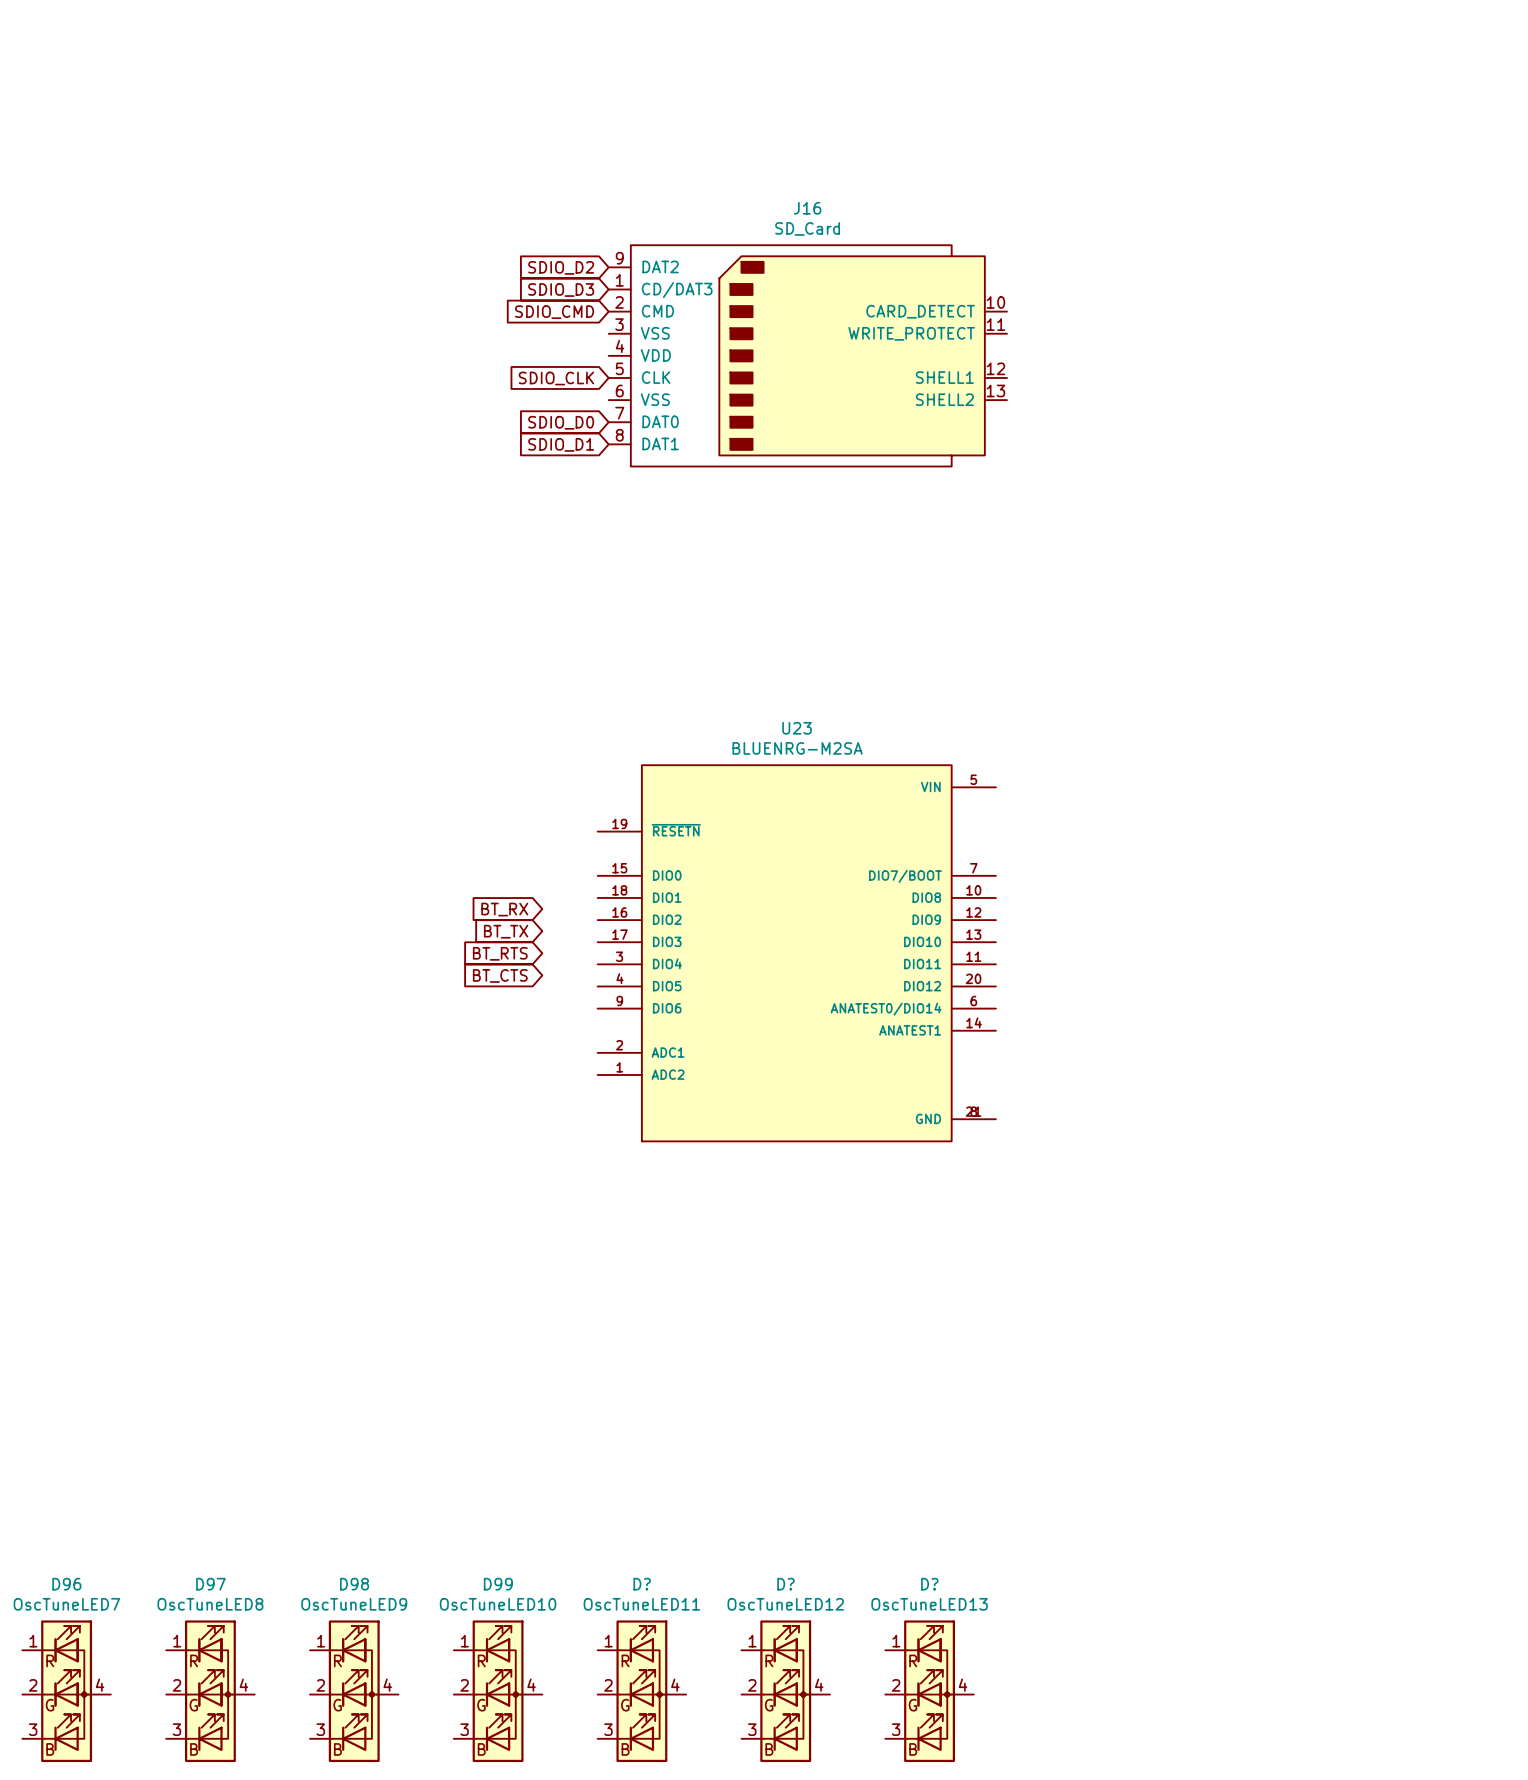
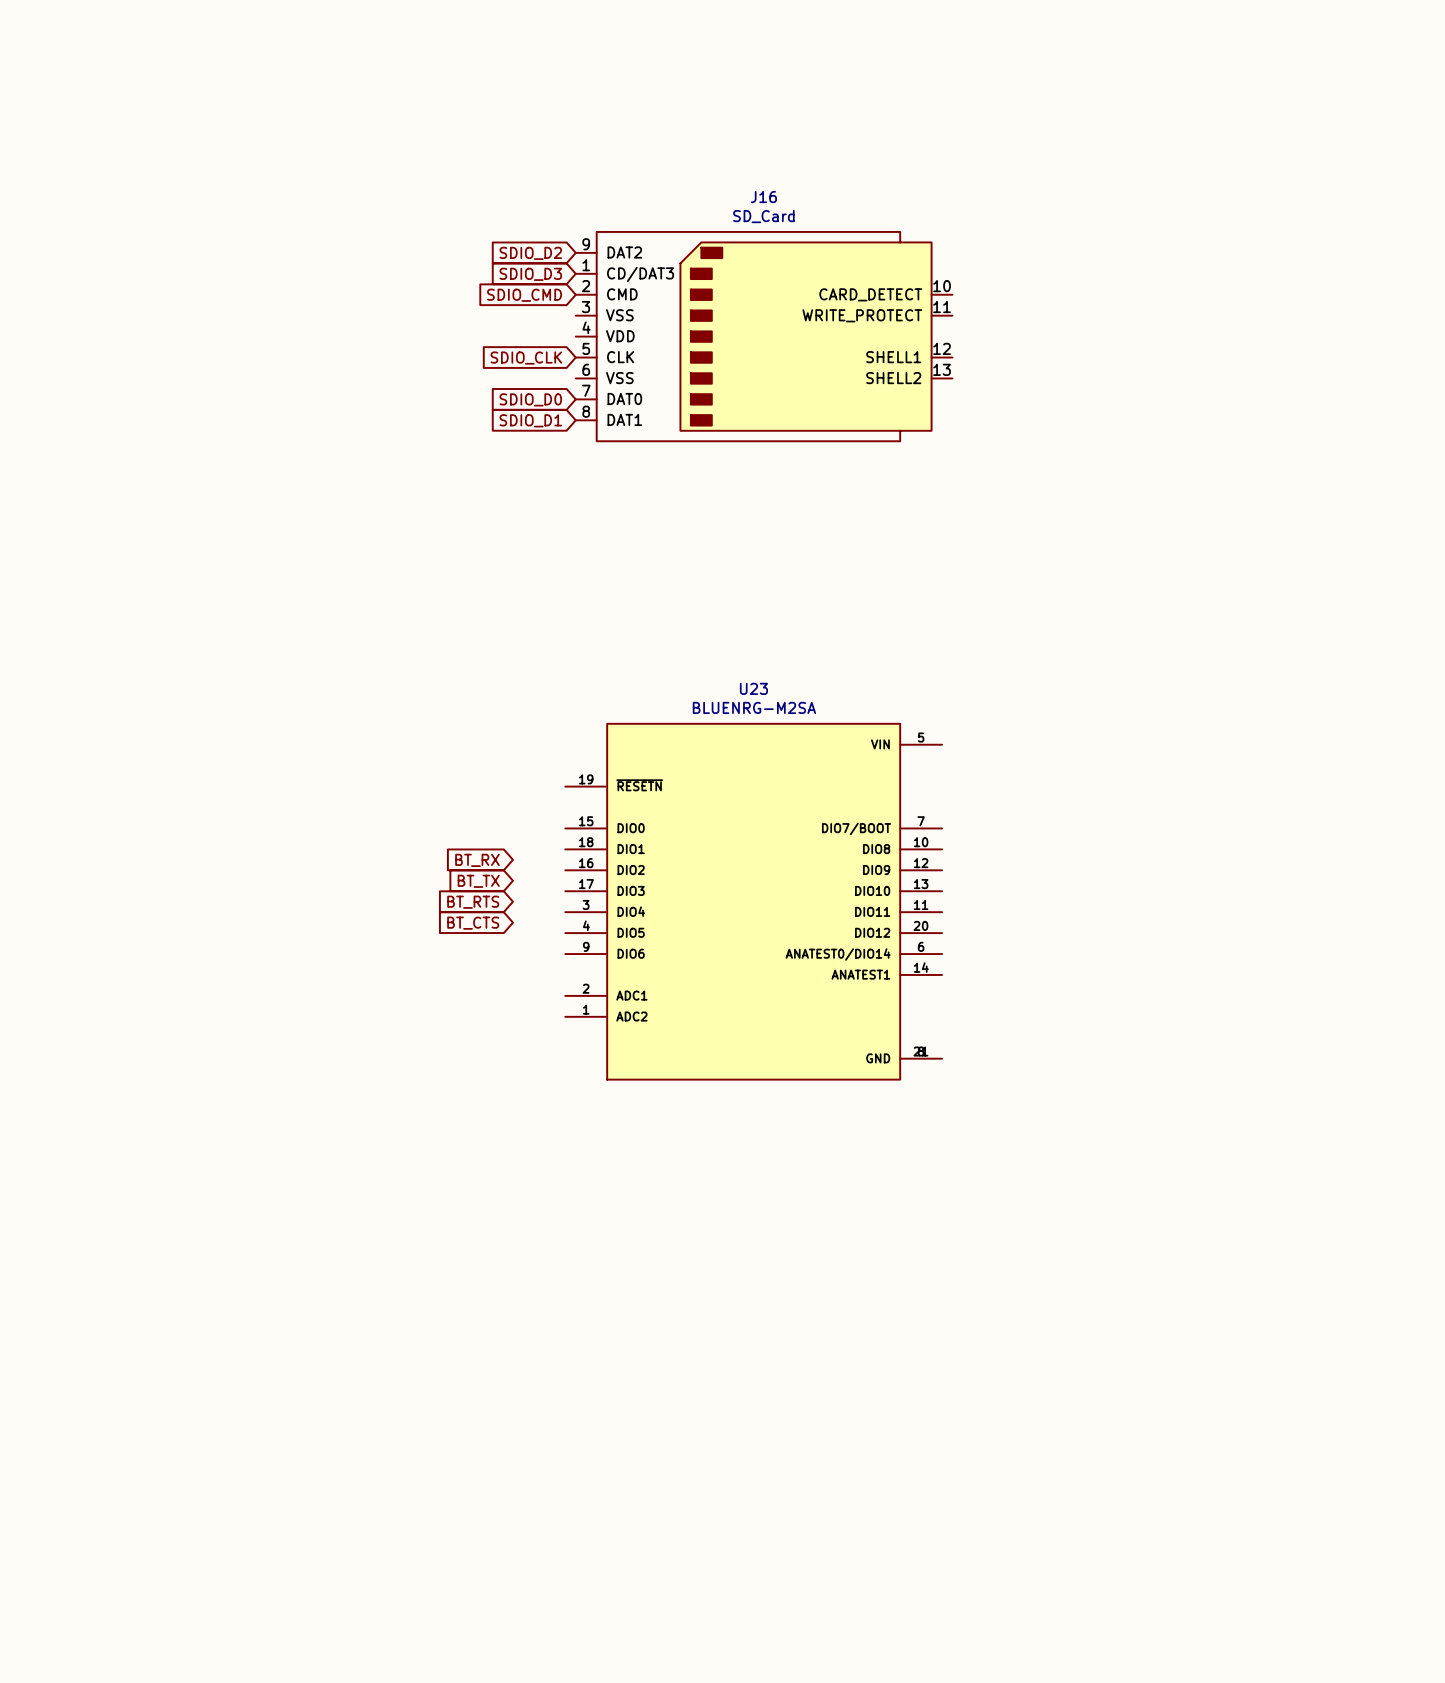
D96: OscTuneLED7 (66, 1691) -> none
D97: OscTuneLED8 (210, 1691) -> none
D98: OscTuneLED9 (354, 1691) -> none
D99: OscTuneLED10 (498, 1691) -> none
D?: OscTuneLED11 (641, 1691) -> none
D?: OscTuneLED12 (785, 1691) -> none
D?: OscTuneLED13 (929, 1691) -> none

